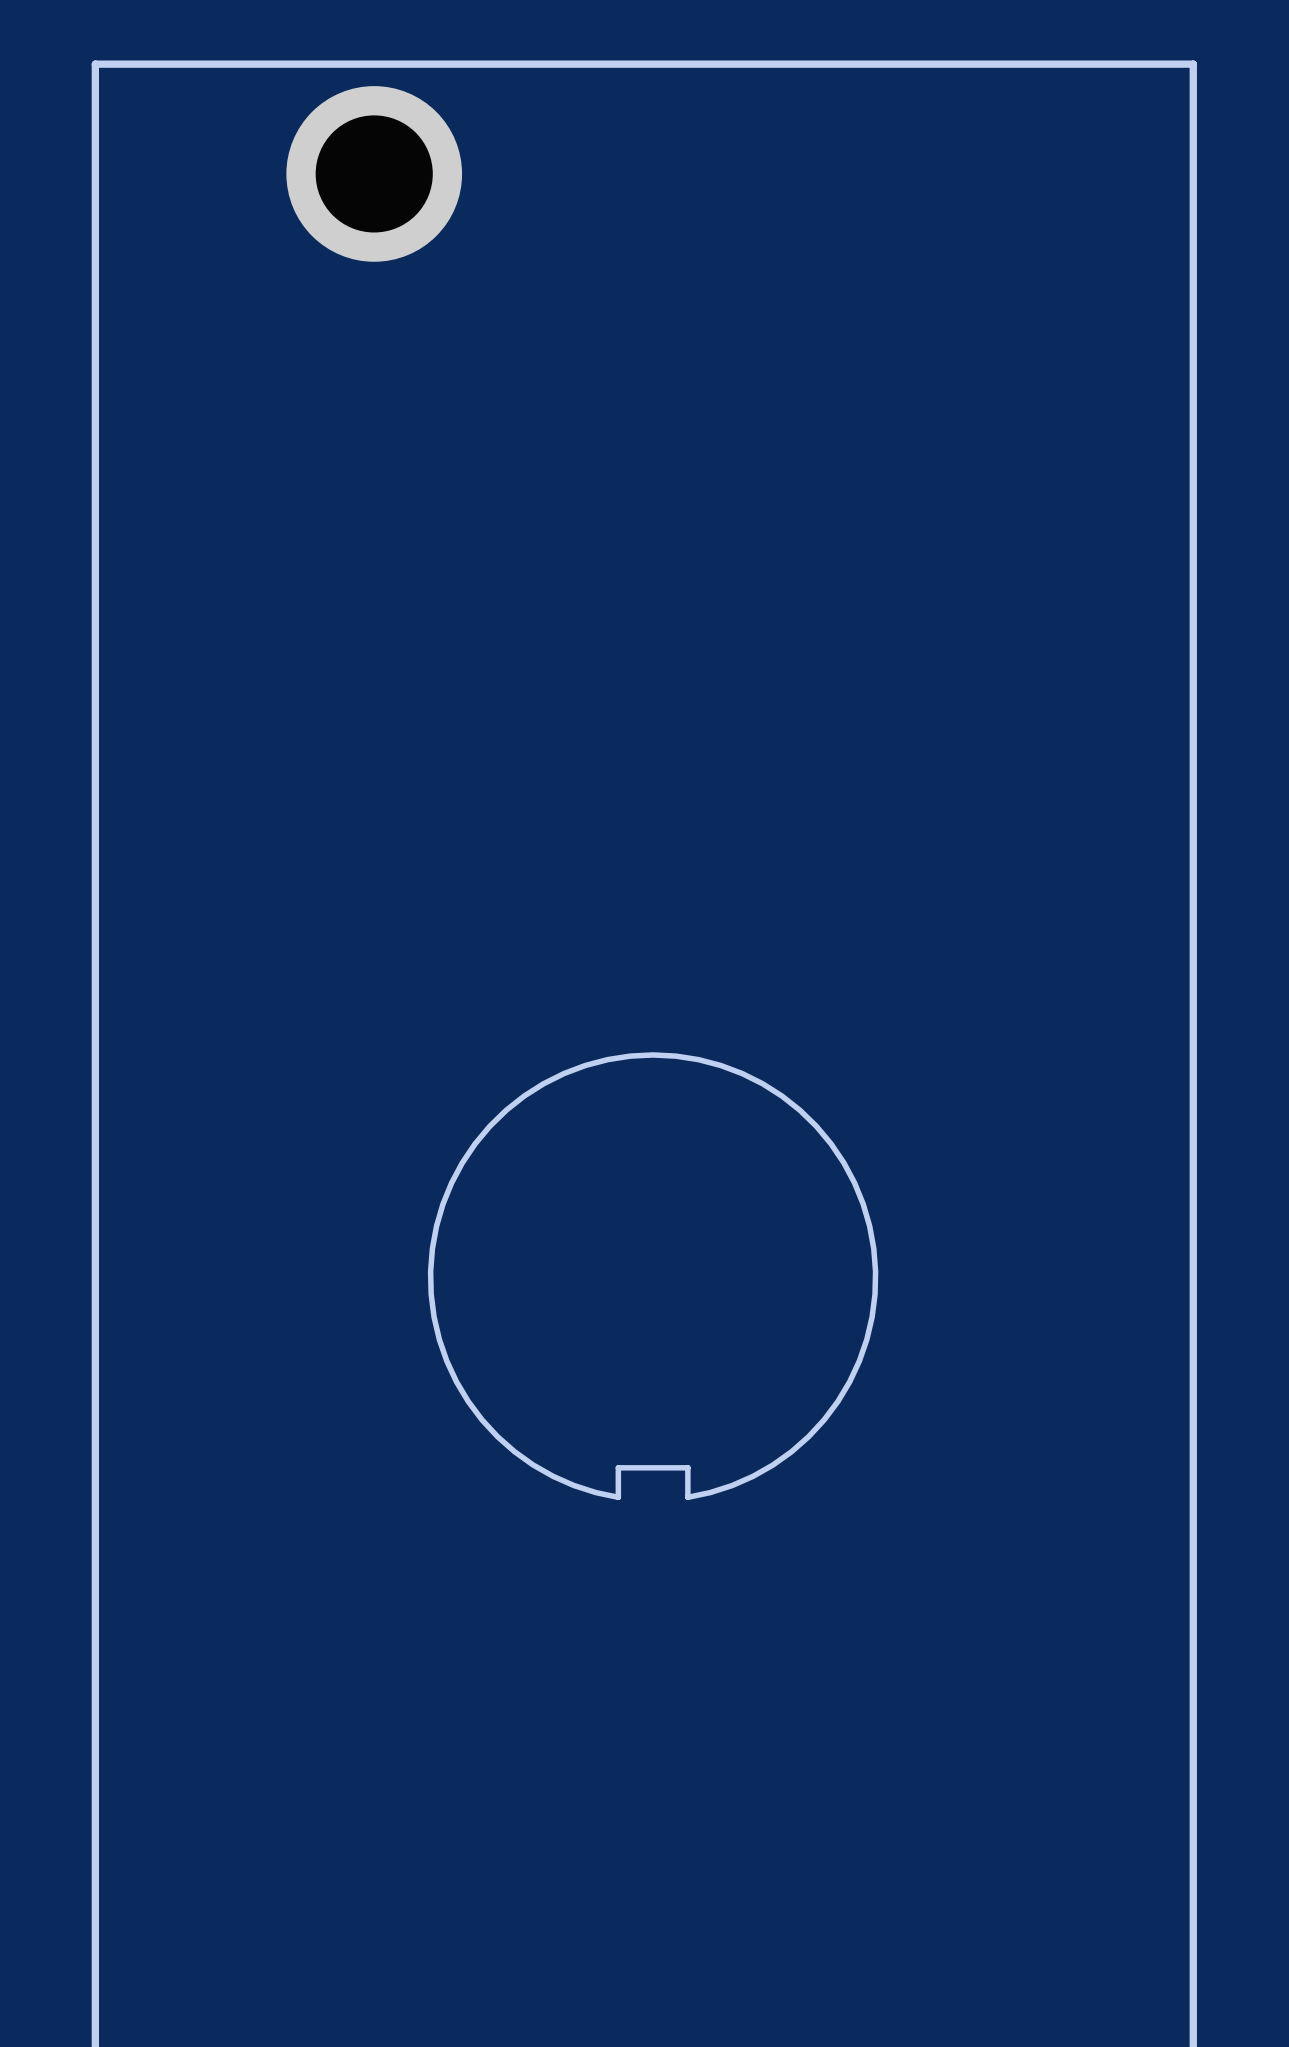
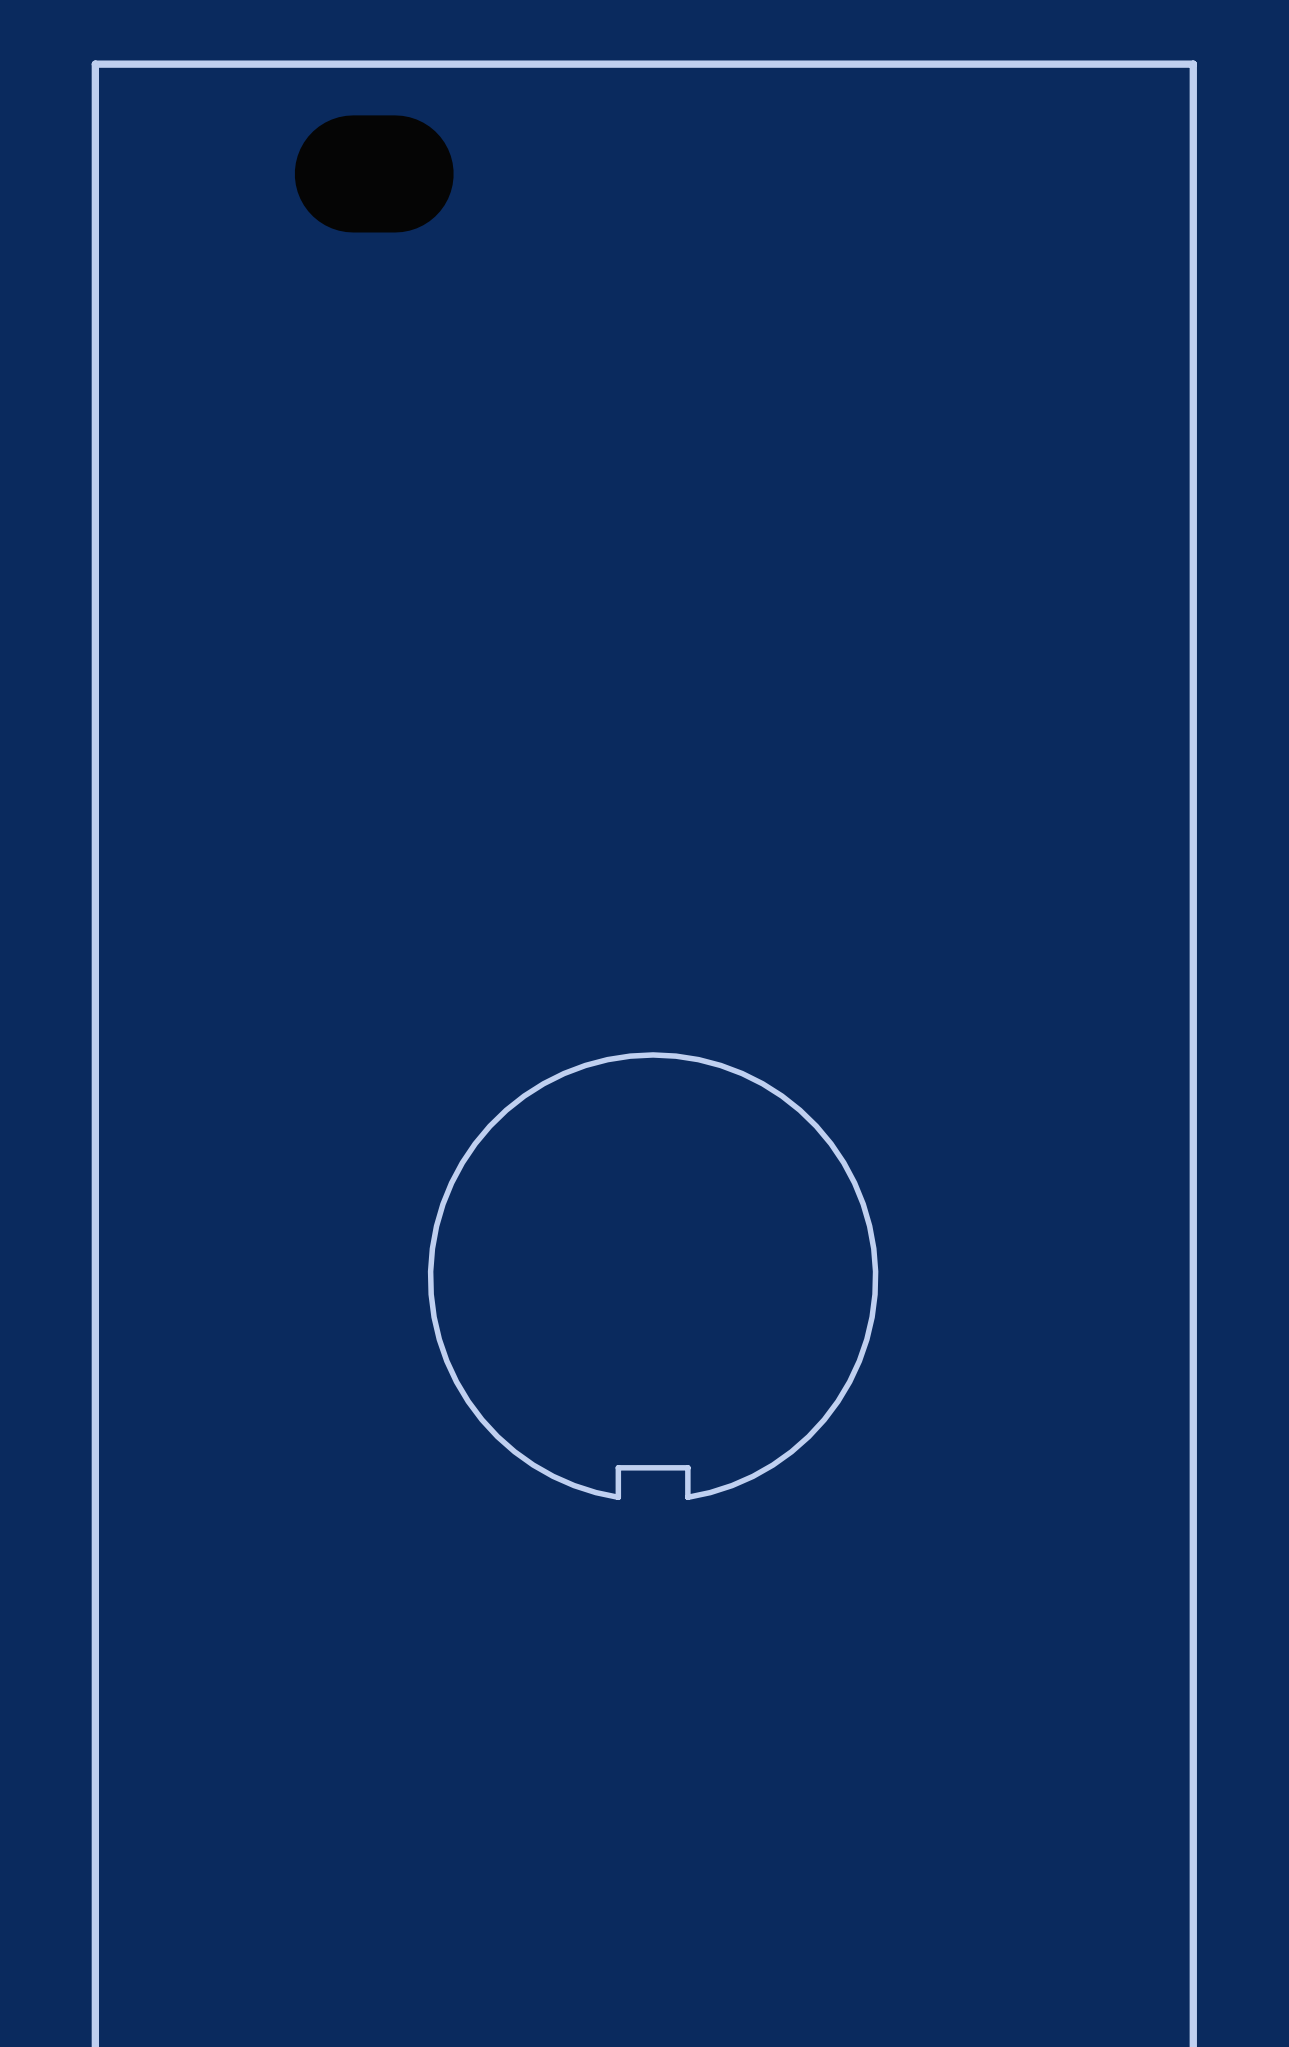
part footprint: [286, 86, 463, 262] -> [294, 115, 454, 233]

